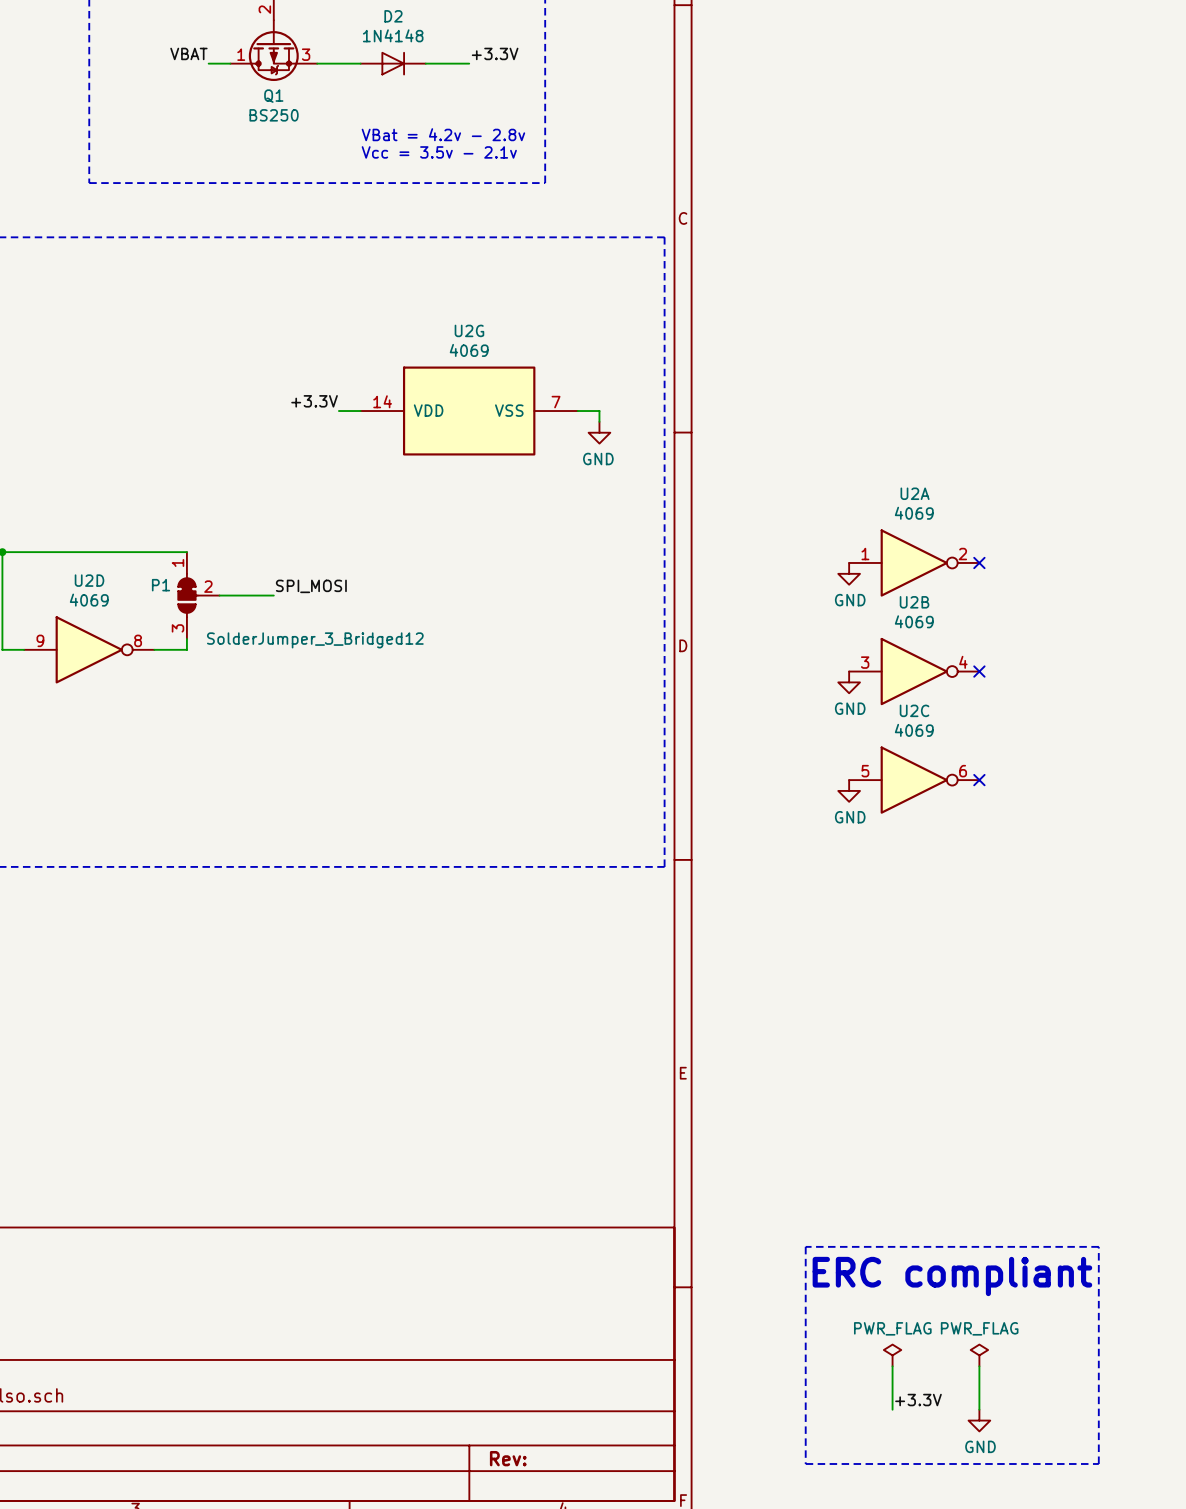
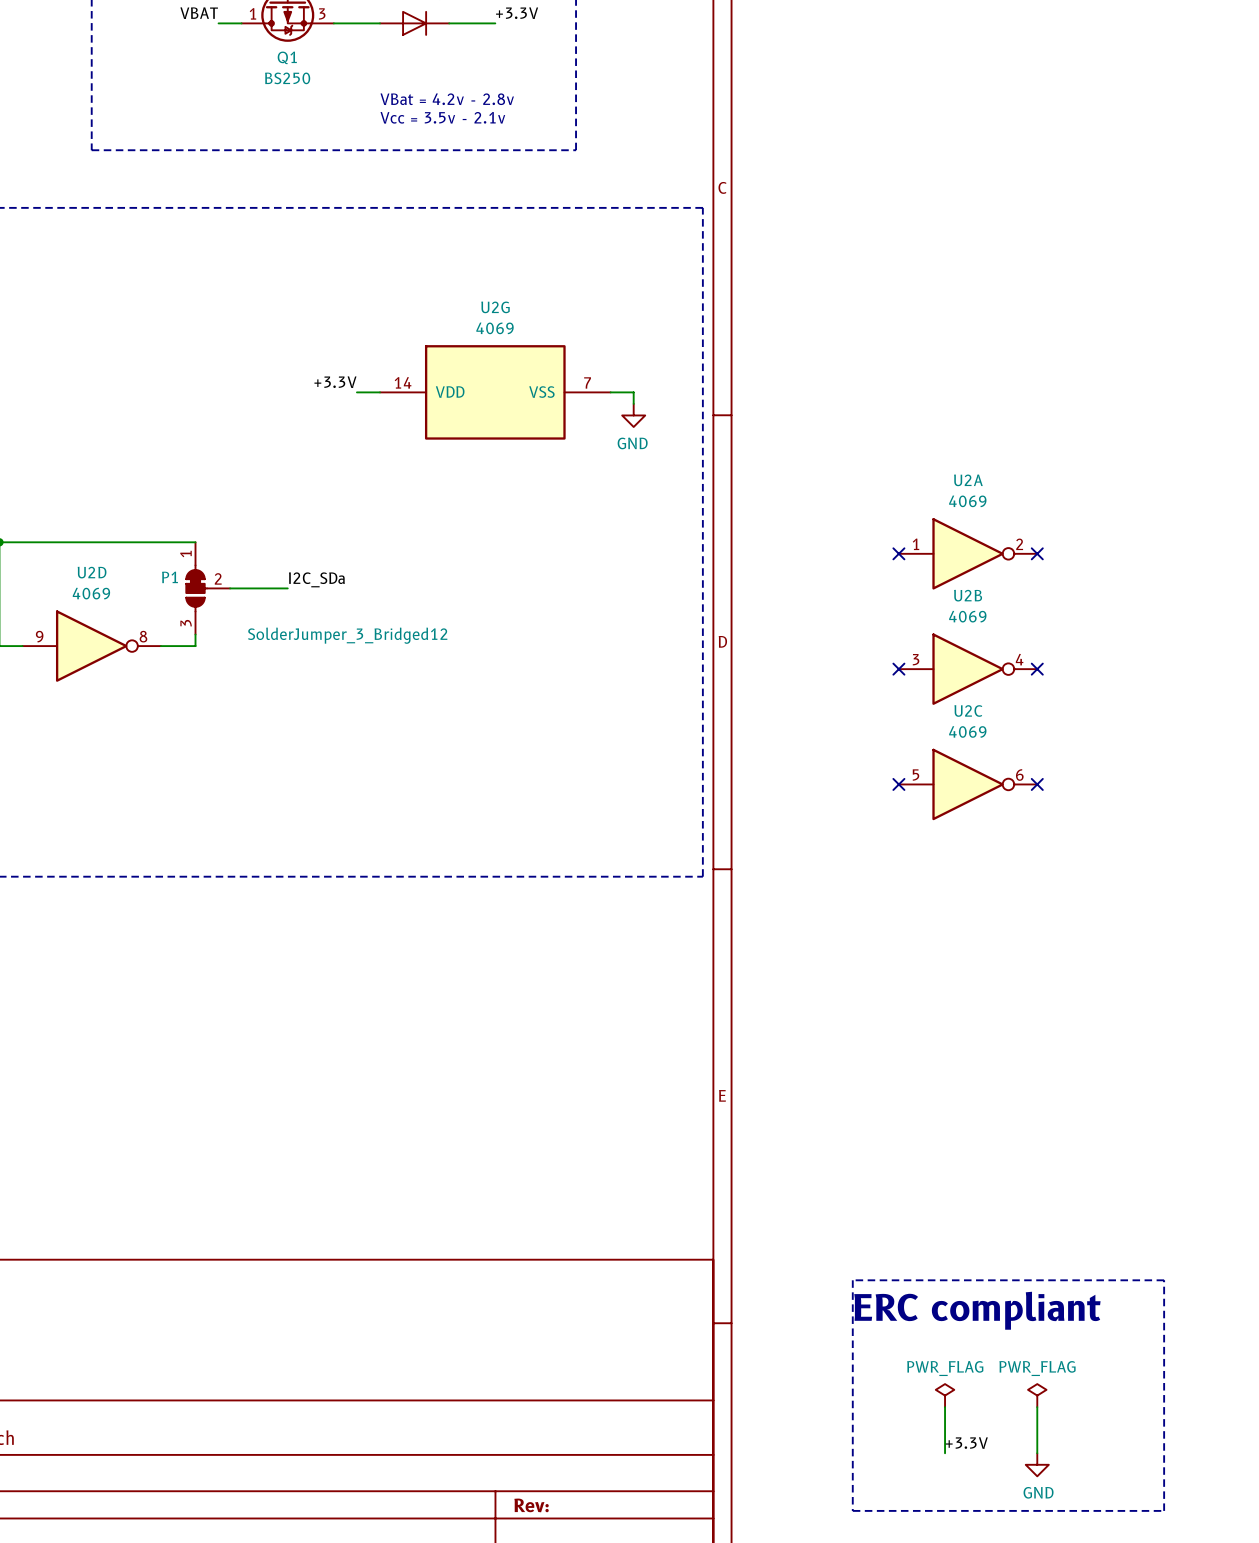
no-connect mark: none -> (898, 553)
power symbol: GND (849, 573) -> none
label: SPI_MOSI (311, 586) -> I2C_SDa (316, 579)
no-connect mark: none -> (898, 669)
power symbol: GND (849, 682) -> none
no-connect mark: none -> (898, 784)
power symbol: GND (849, 790) -> none

